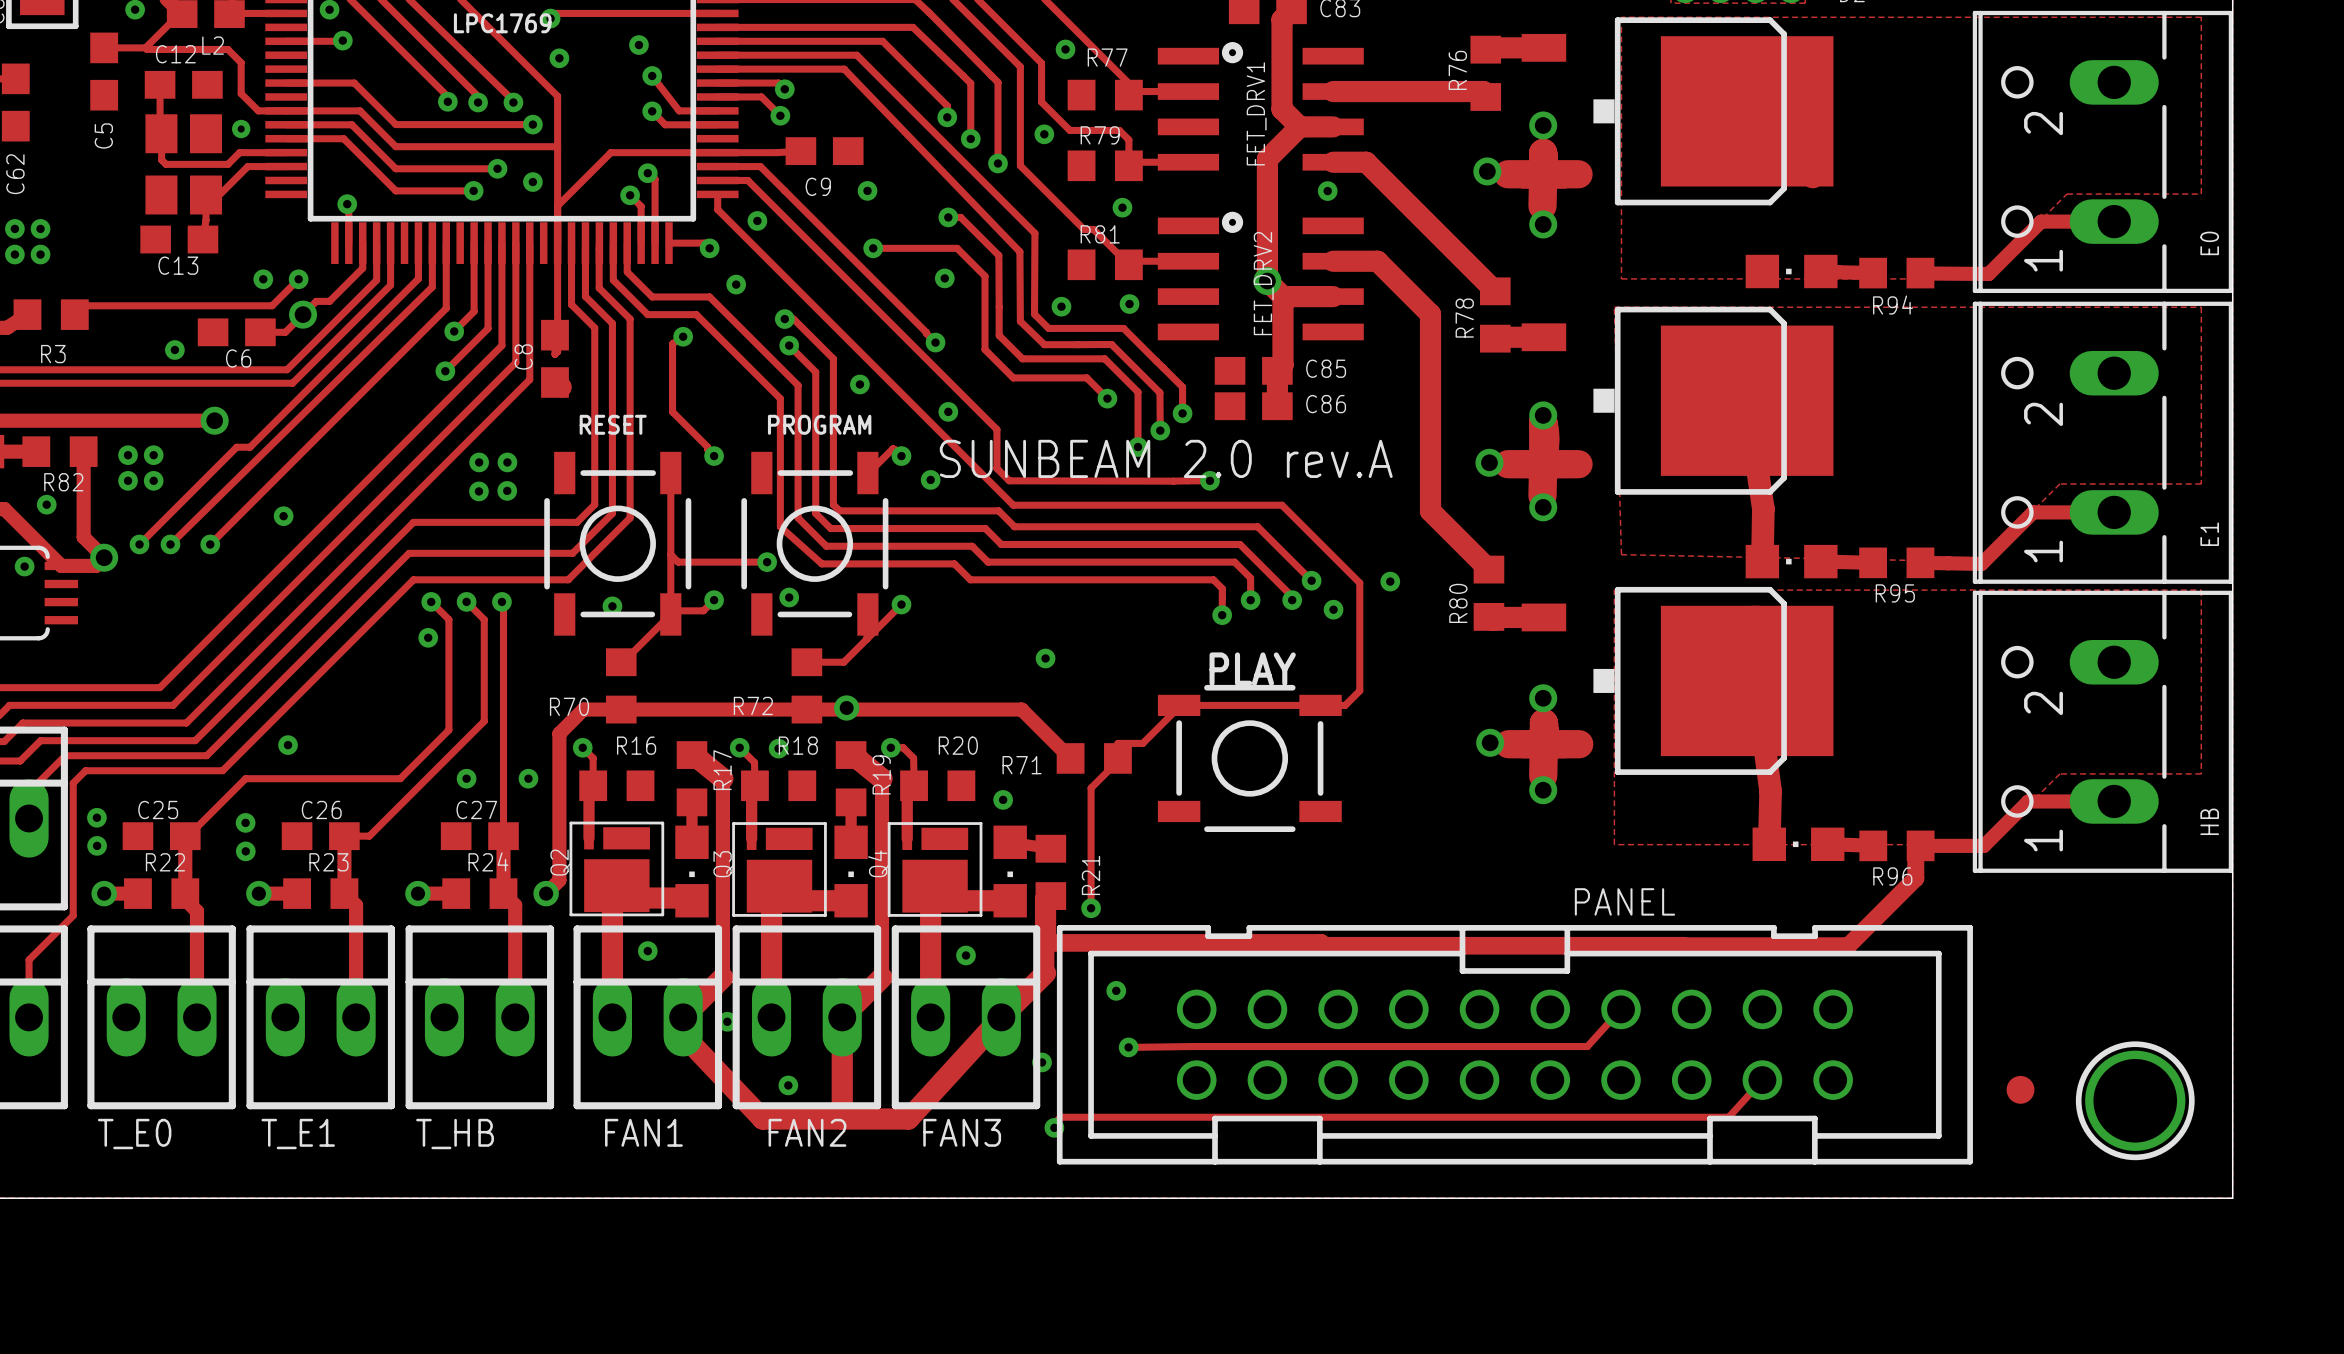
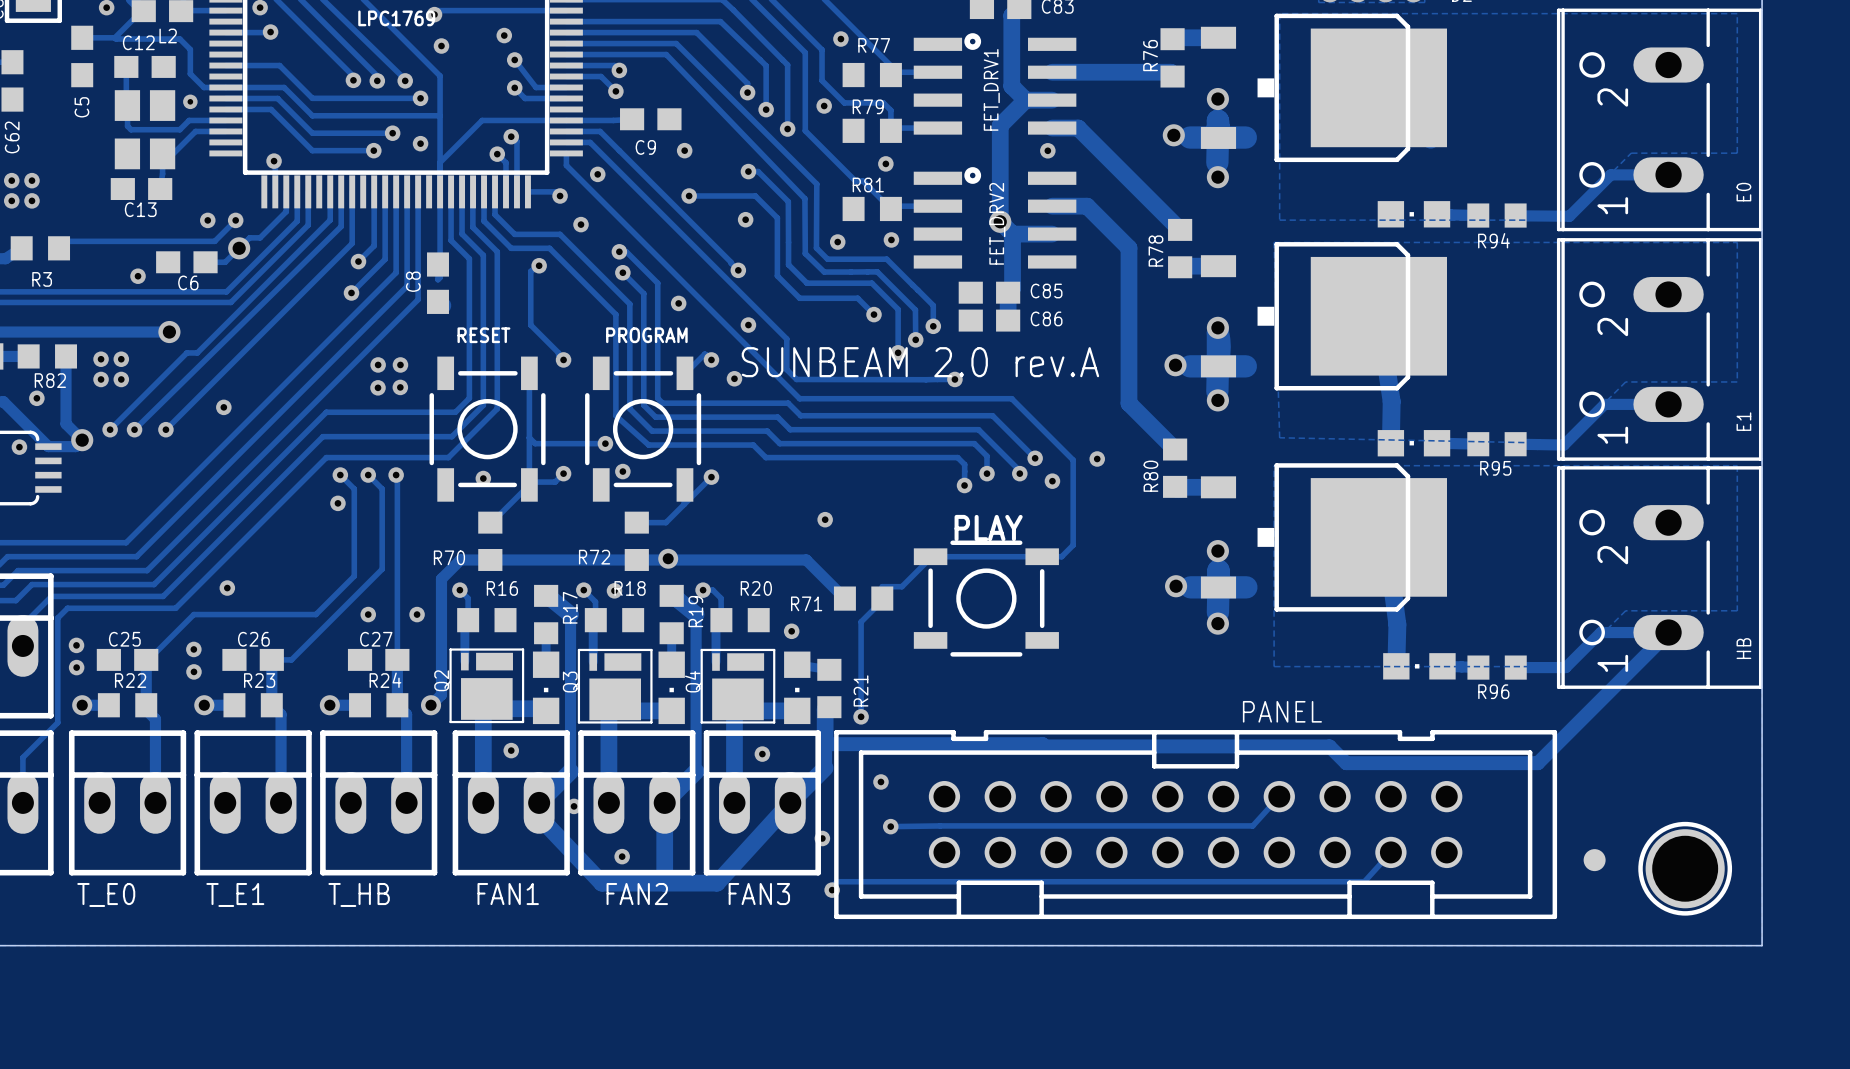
track: (1920, 845) (1915, 851) (1915, 878) (1848, 945) (1684, 945) -> (1668, 632) (1537, 763) (1346, 763) (1329, 746)

